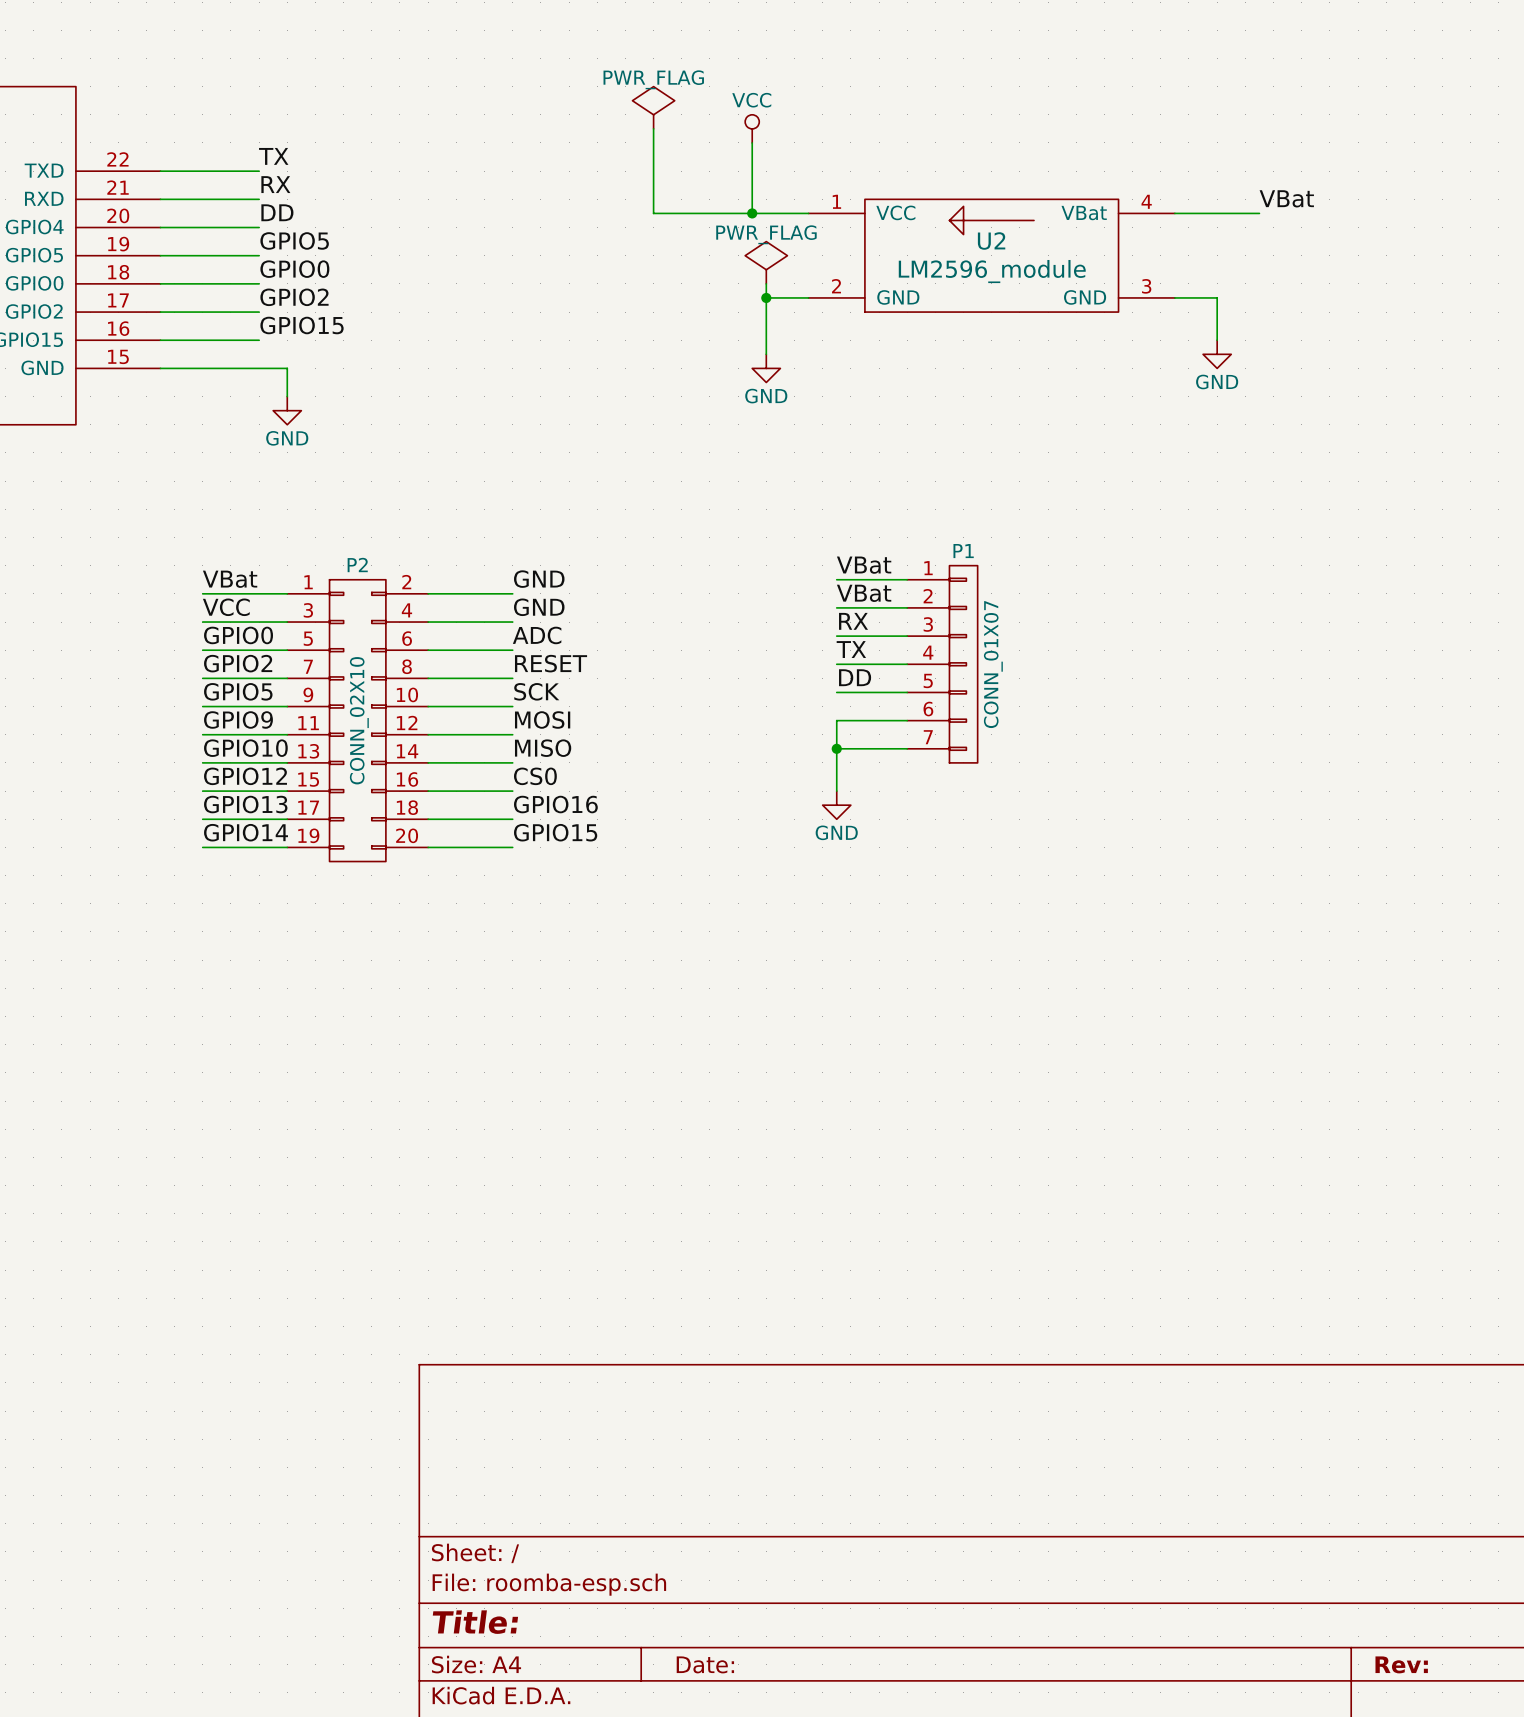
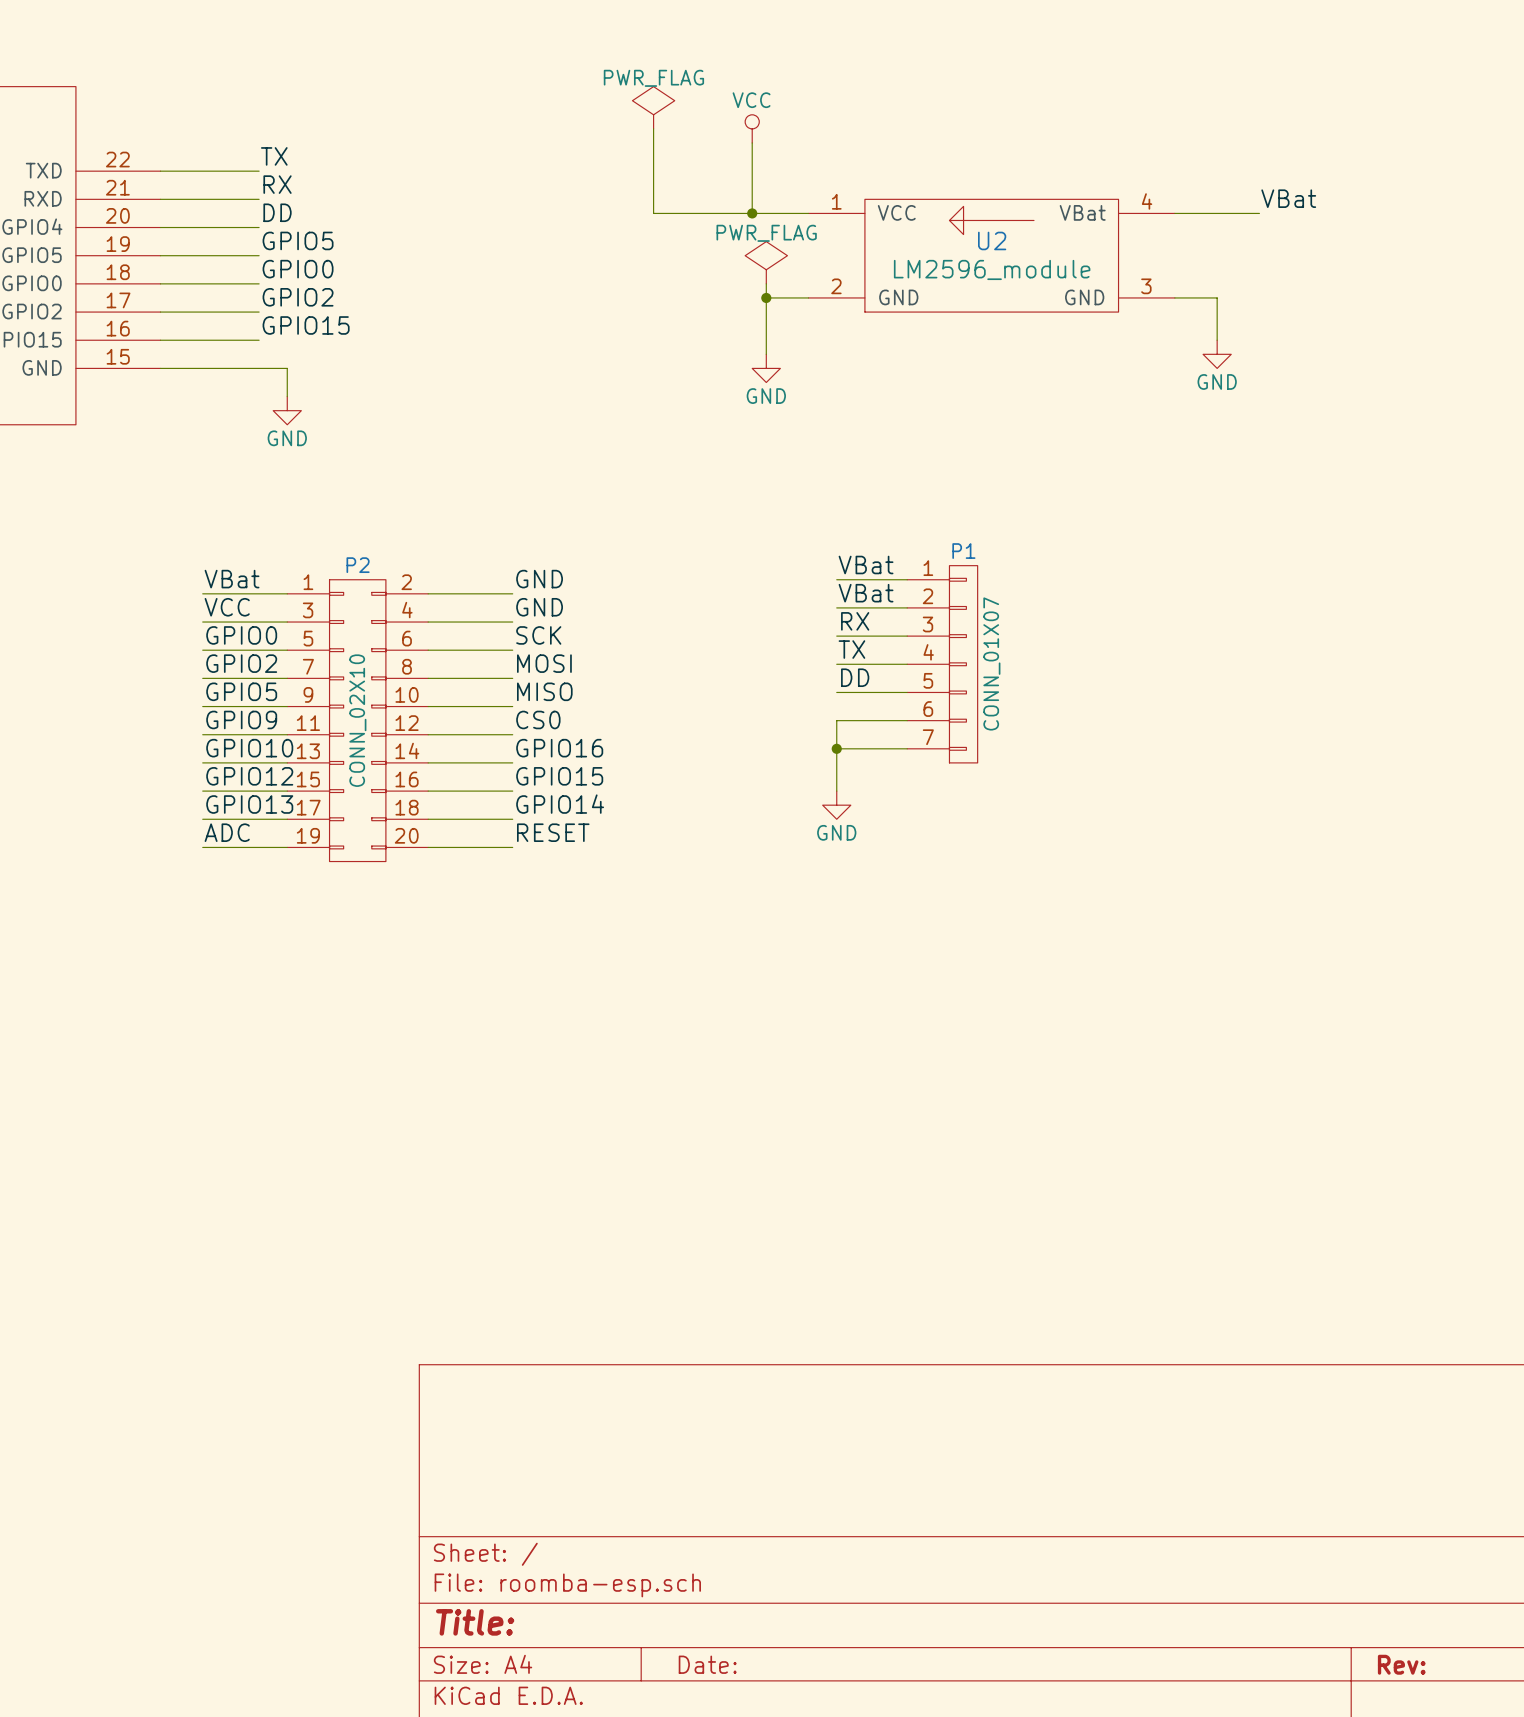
label: ADC (537, 635) -> SCK (538, 635)
label: RESET (551, 663) -> MOSI (544, 663)
label: SCK (536, 691) -> MISO (544, 691)
label: MOSI (542, 719) -> CS0 (538, 719)
label: MISO (543, 748) -> GPIO16 (559, 748)
label: CS0 (535, 776) -> GPIO15 (559, 776)
label: GPIO16 (555, 804) -> GPIO14 (560, 804)
label: GPIO14 (246, 832) -> ADC (227, 832)
label: GPIO15 (555, 832) -> RESET (553, 832)

